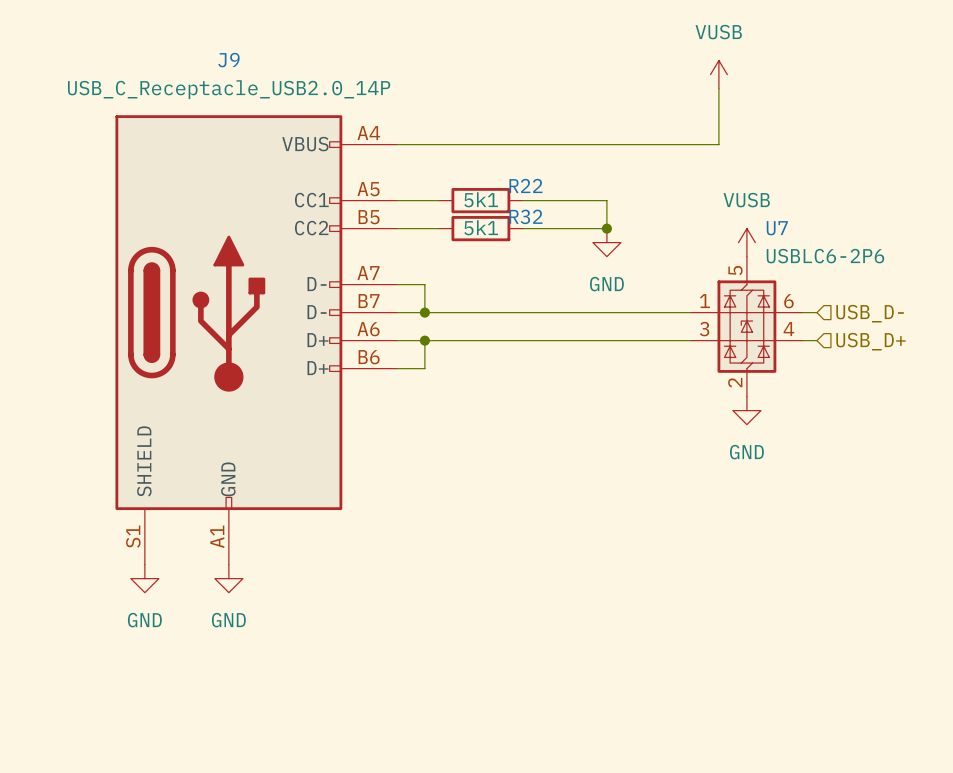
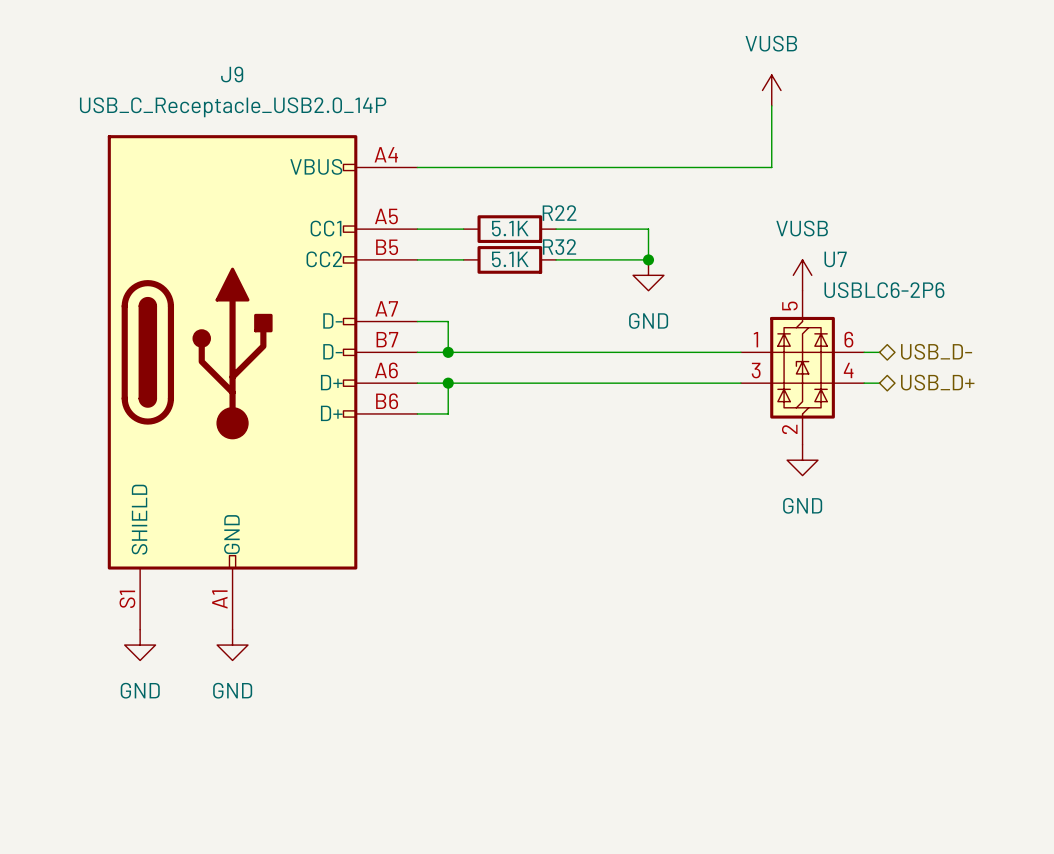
R22 value: 5k1 (481, 199) -> 5.1K (510, 228)
R32 value: 5k1 (481, 227) -> 5.1K (510, 259)
hierarchical label shape: input (870, 313) -> bidirectional (936, 351)
hierarchical label shape: input (871, 341) -> bidirectional (937, 382)

